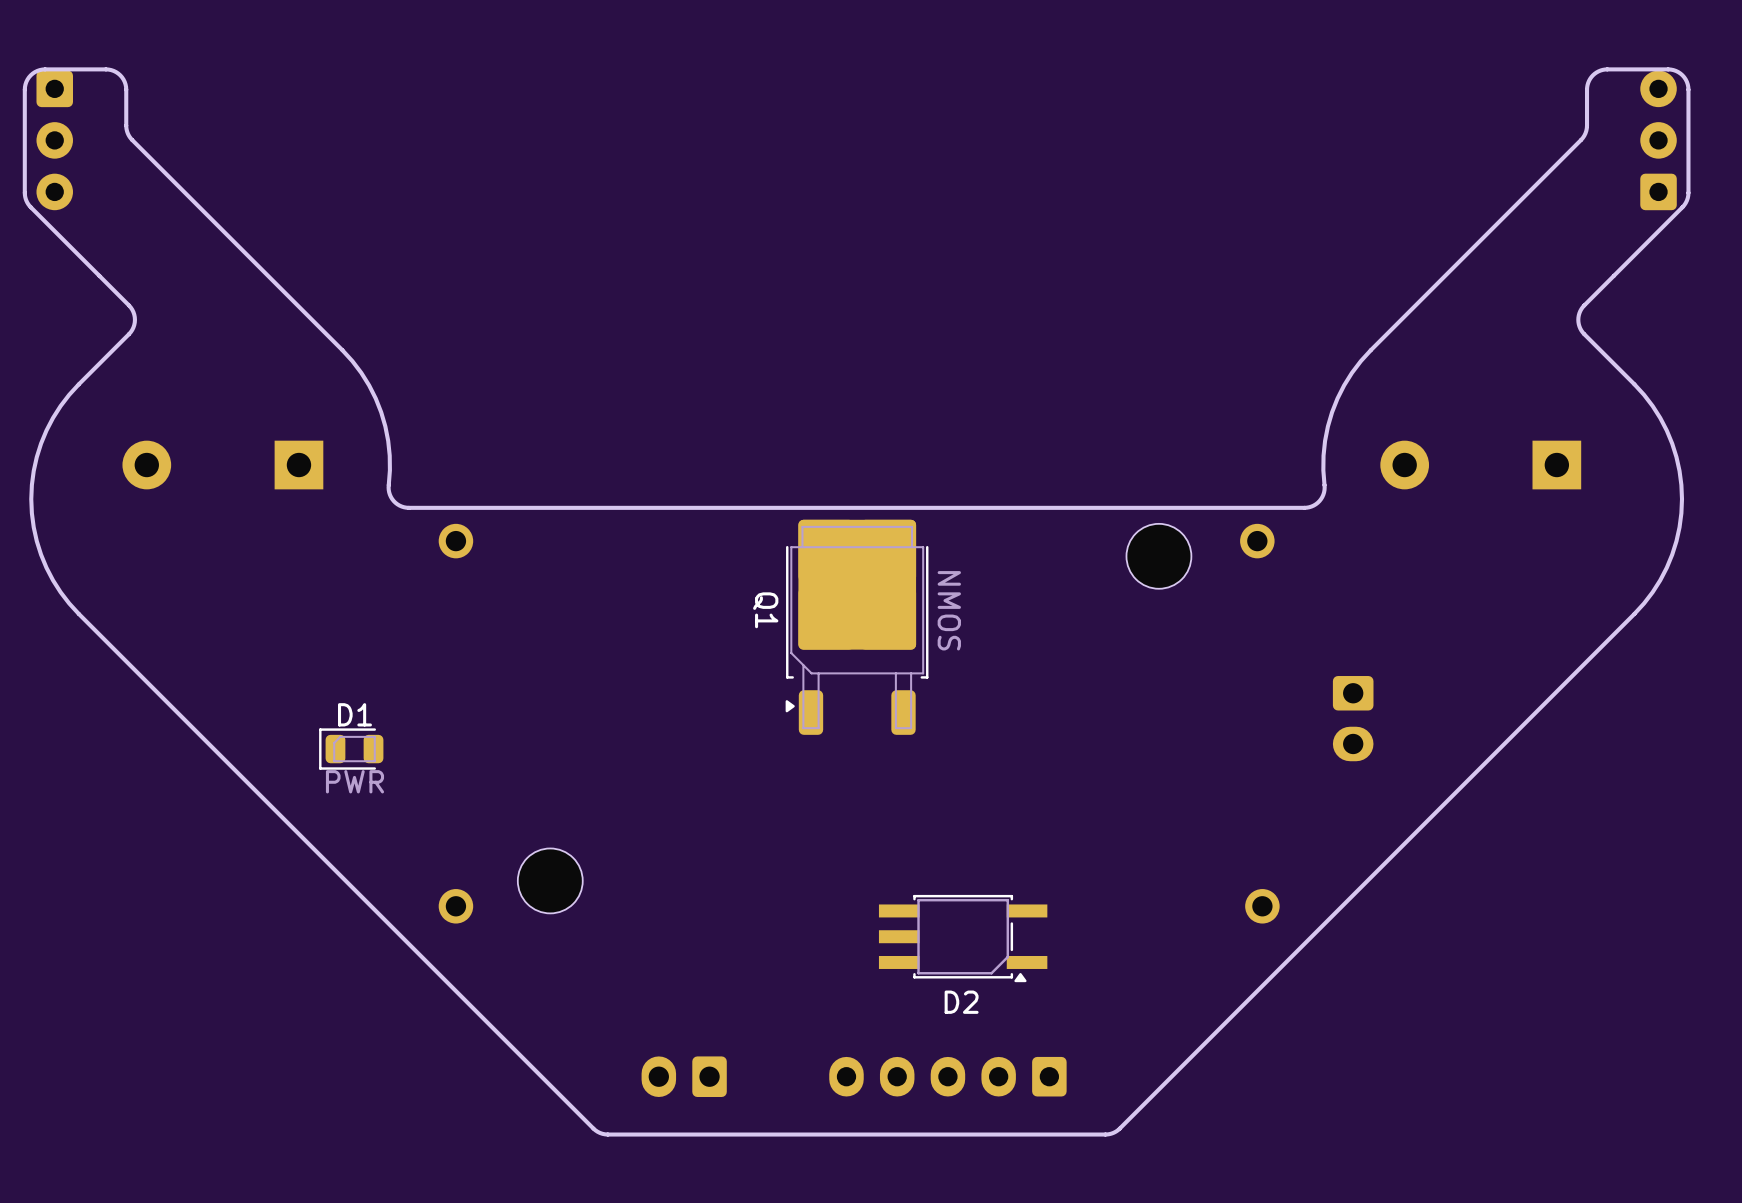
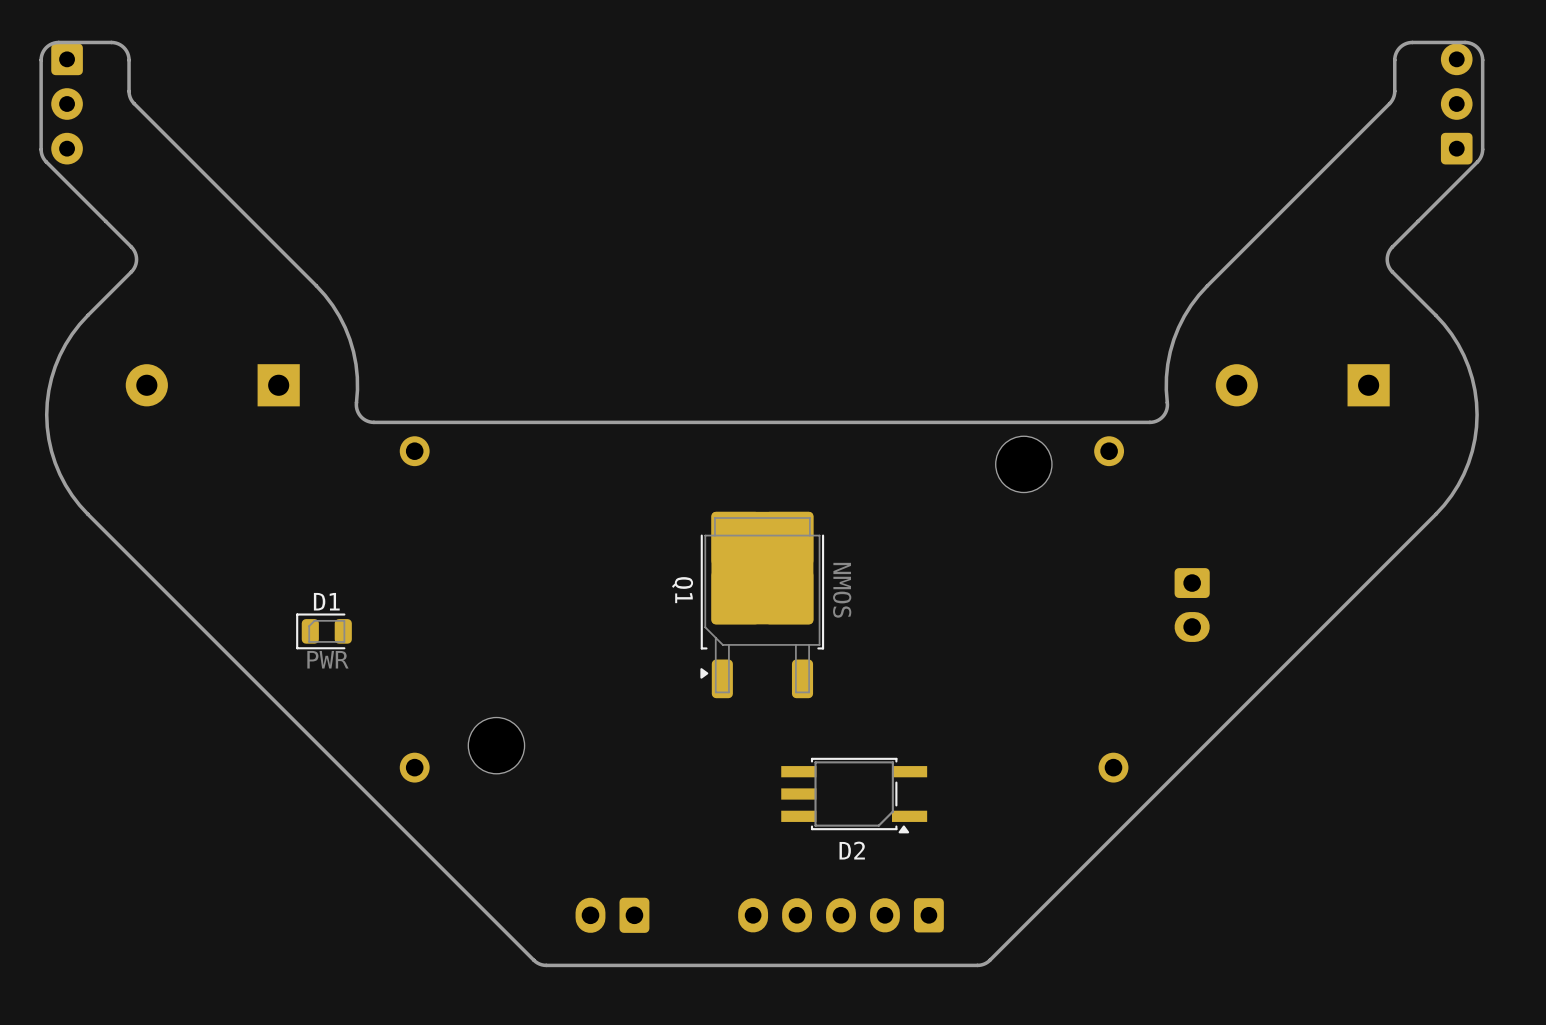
Q1 position: (857, 627) -> (762, 605)

